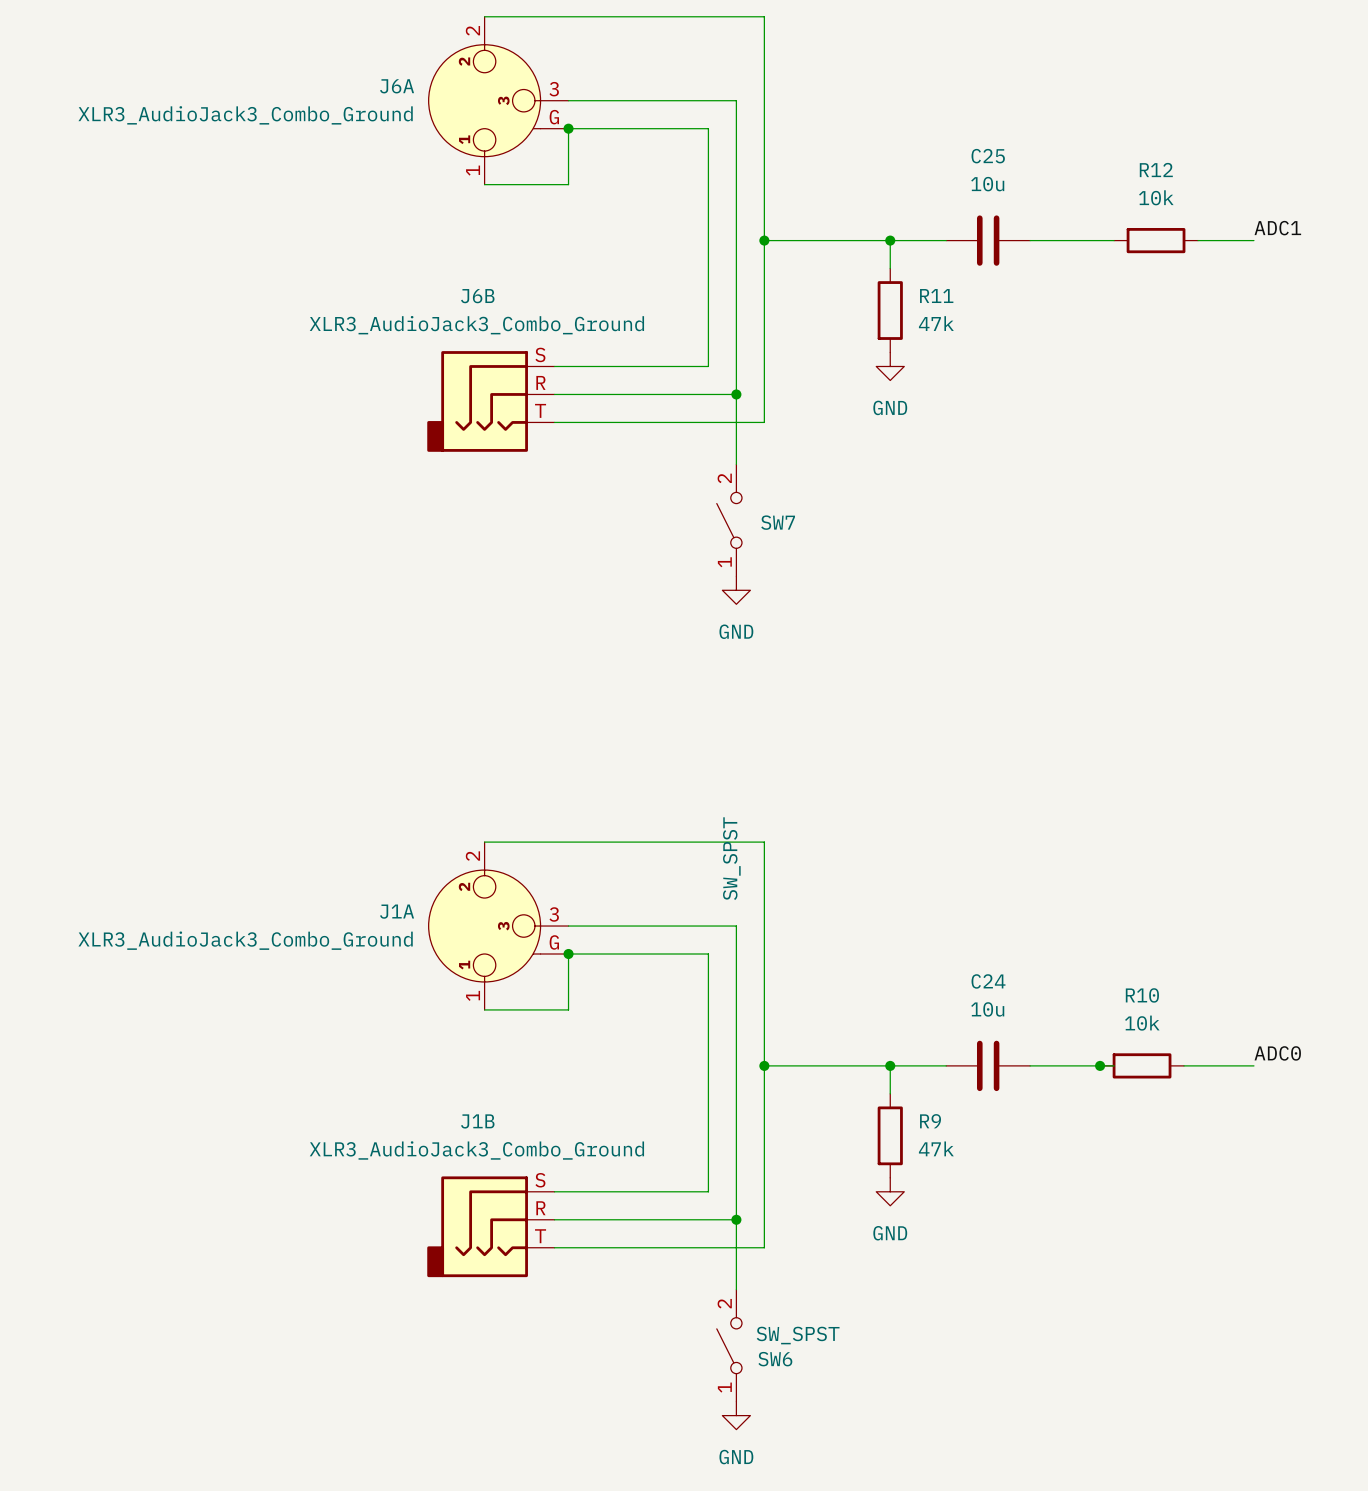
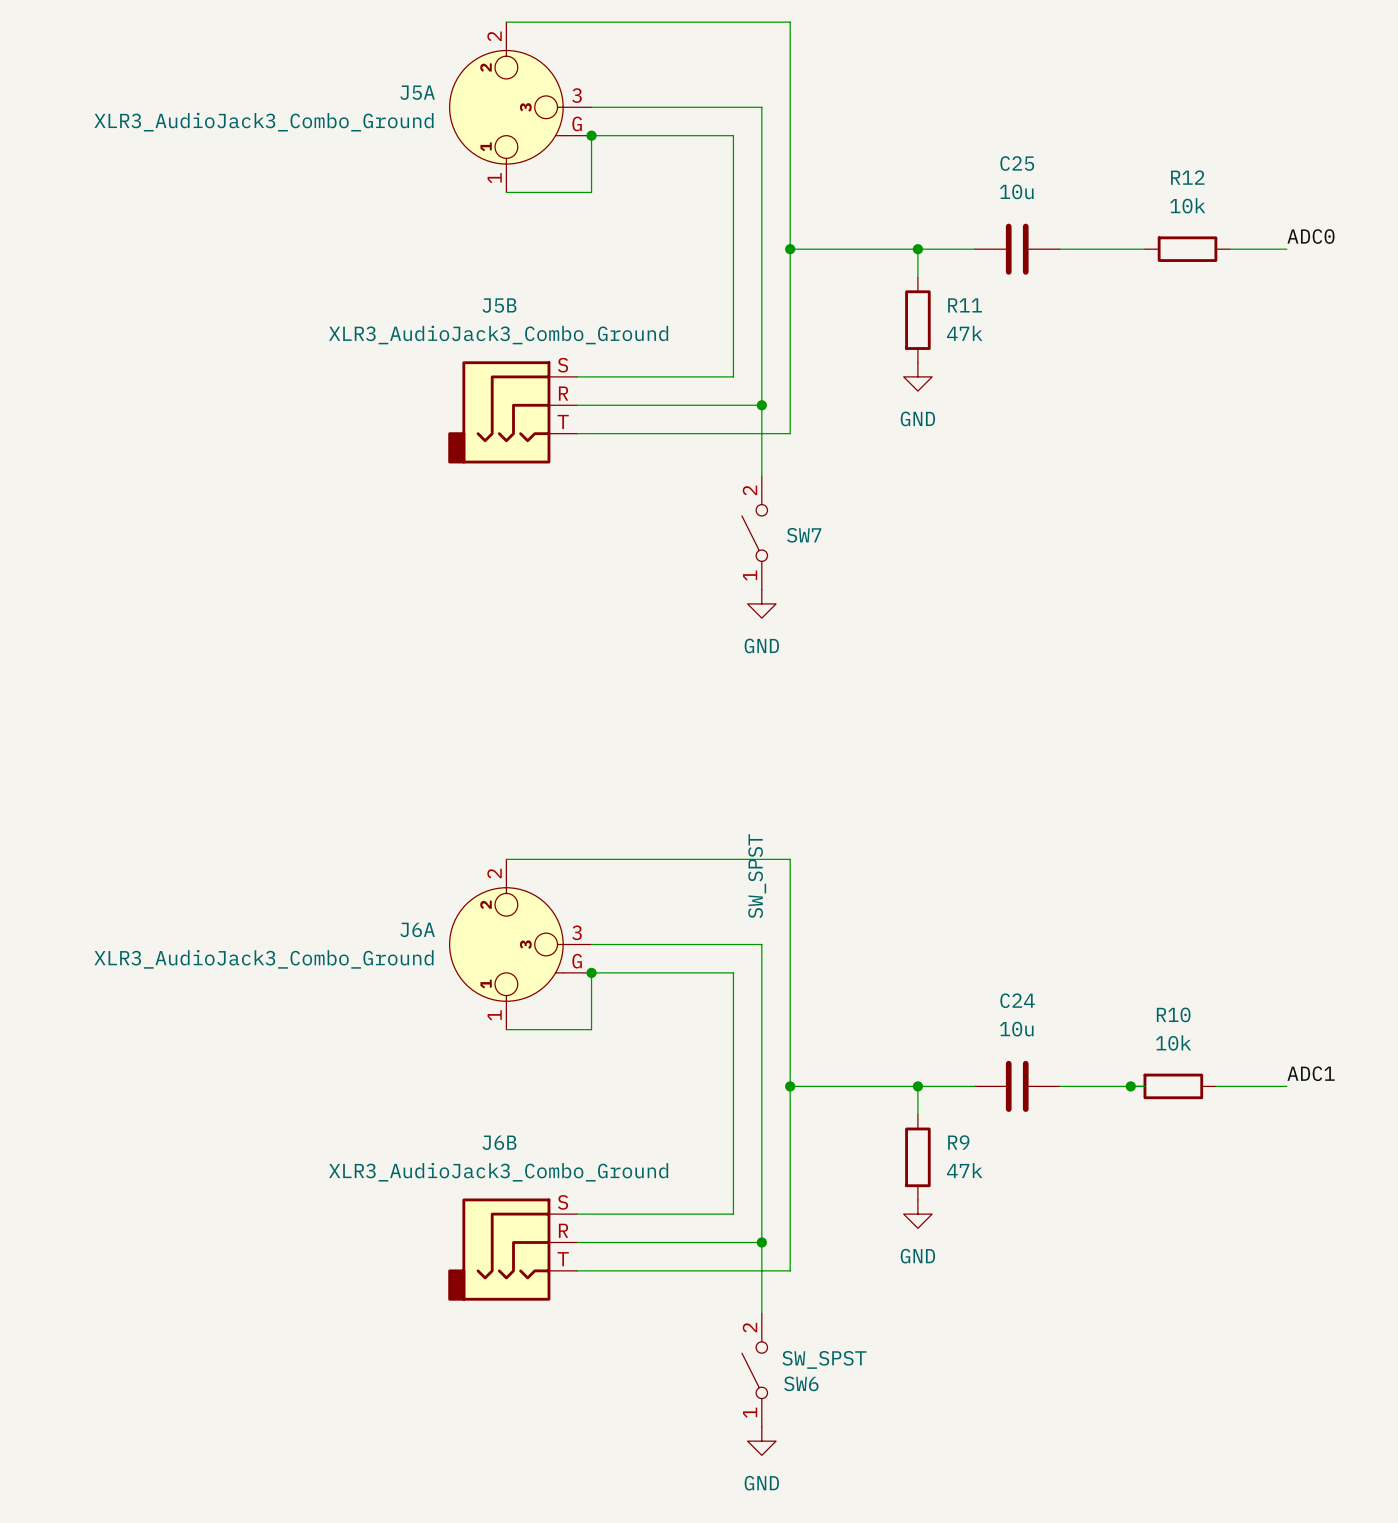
J6A name: J6A (397, 86) -> J5A (417, 92)
label: ADC1 (1277, 228) -> ADC0 (1310, 236)
J6B name: J6B (477, 296) -> J5B (499, 305)
J1A name: J1A (397, 911) -> J6A (417, 929)
label: ADC0 (1277, 1053) -> ADC1 (1311, 1073)
J1B name: J1B (477, 1121) -> J6B (499, 1142)

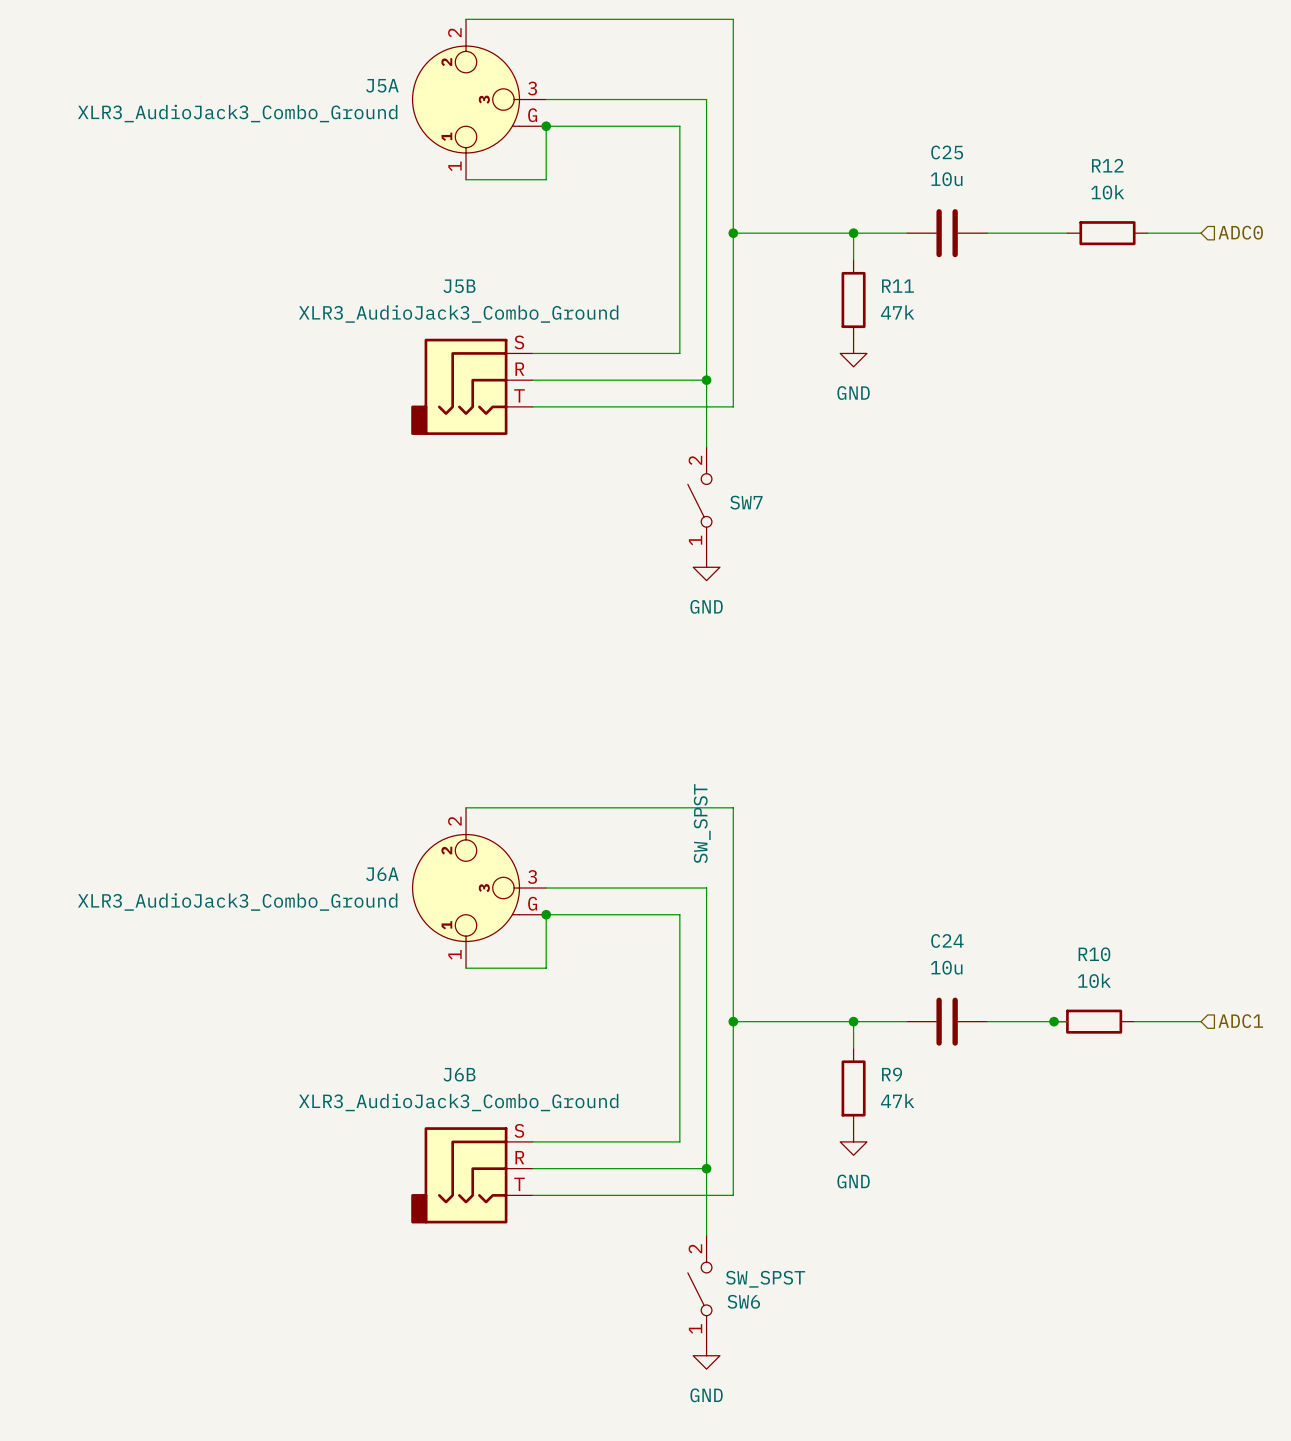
label: ADC0 (1310, 236) -> none
hierarchical label: none -> ADC0 (1240, 232)
label: ADC1 (1311, 1073) -> none
hierarchical label: none -> ADC1 (1240, 1021)

